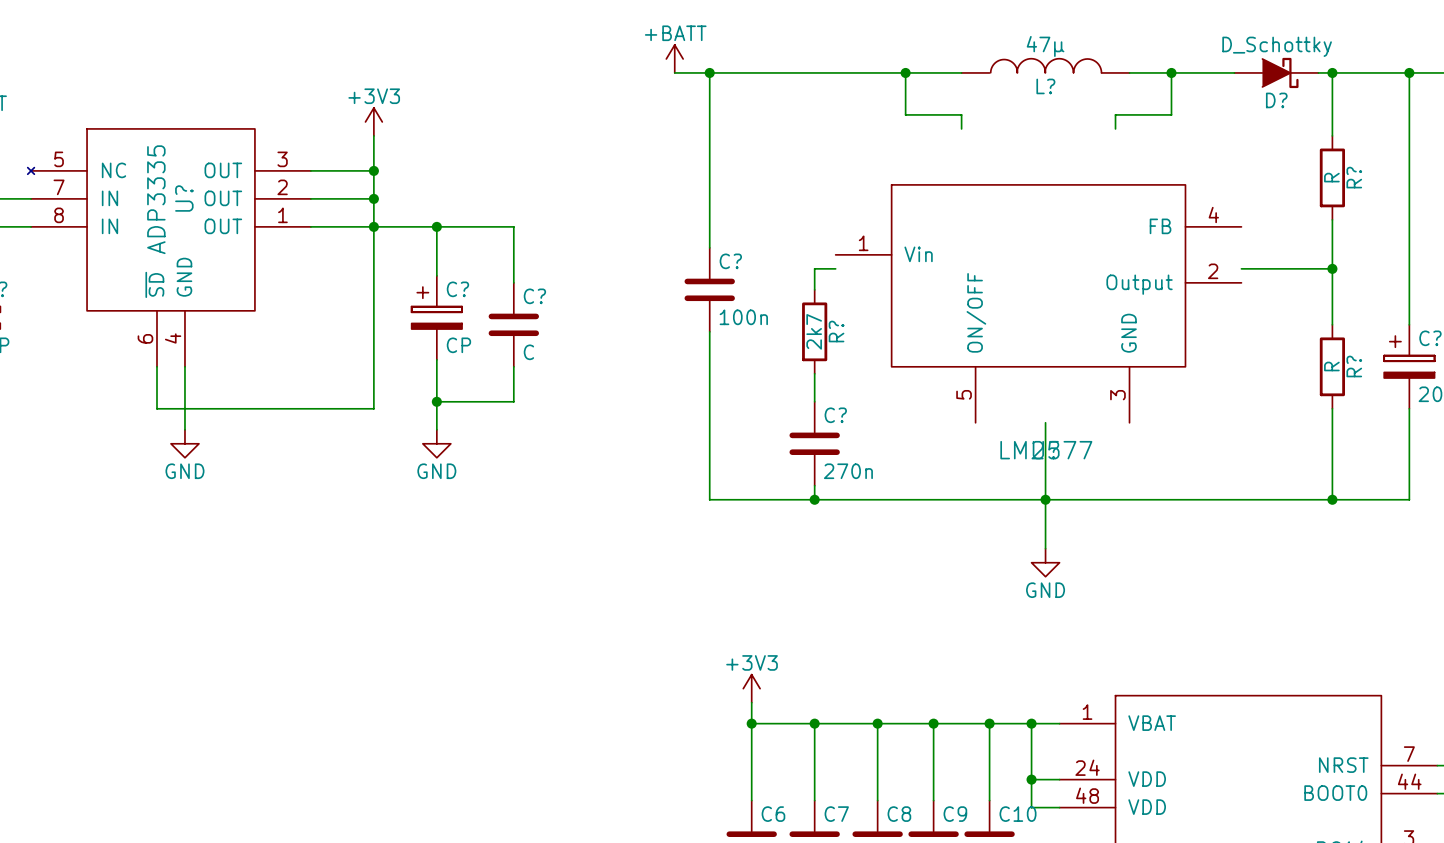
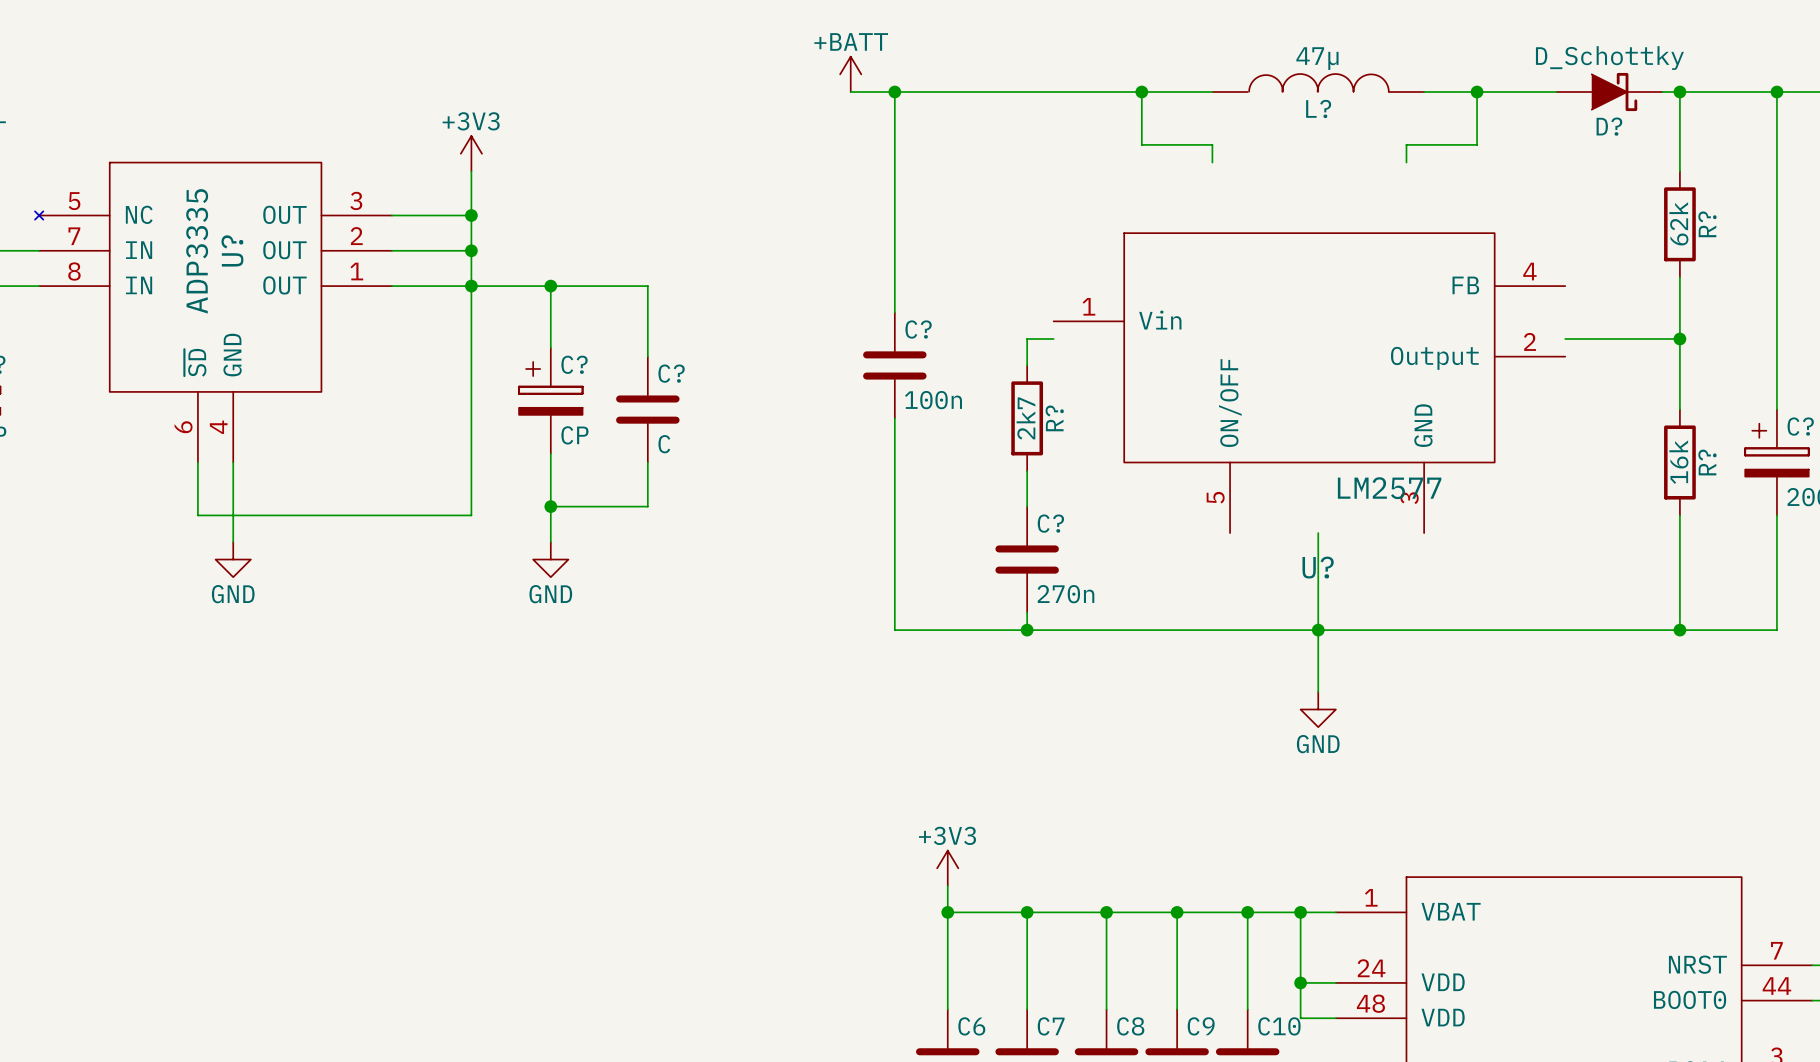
R? value: R (1331, 177) -> 62k (1678, 223)
R? value: R (1331, 366) -> 16k (1678, 462)
U? value position: LM2577 (1046, 450) -> LM2577 (1389, 488)

